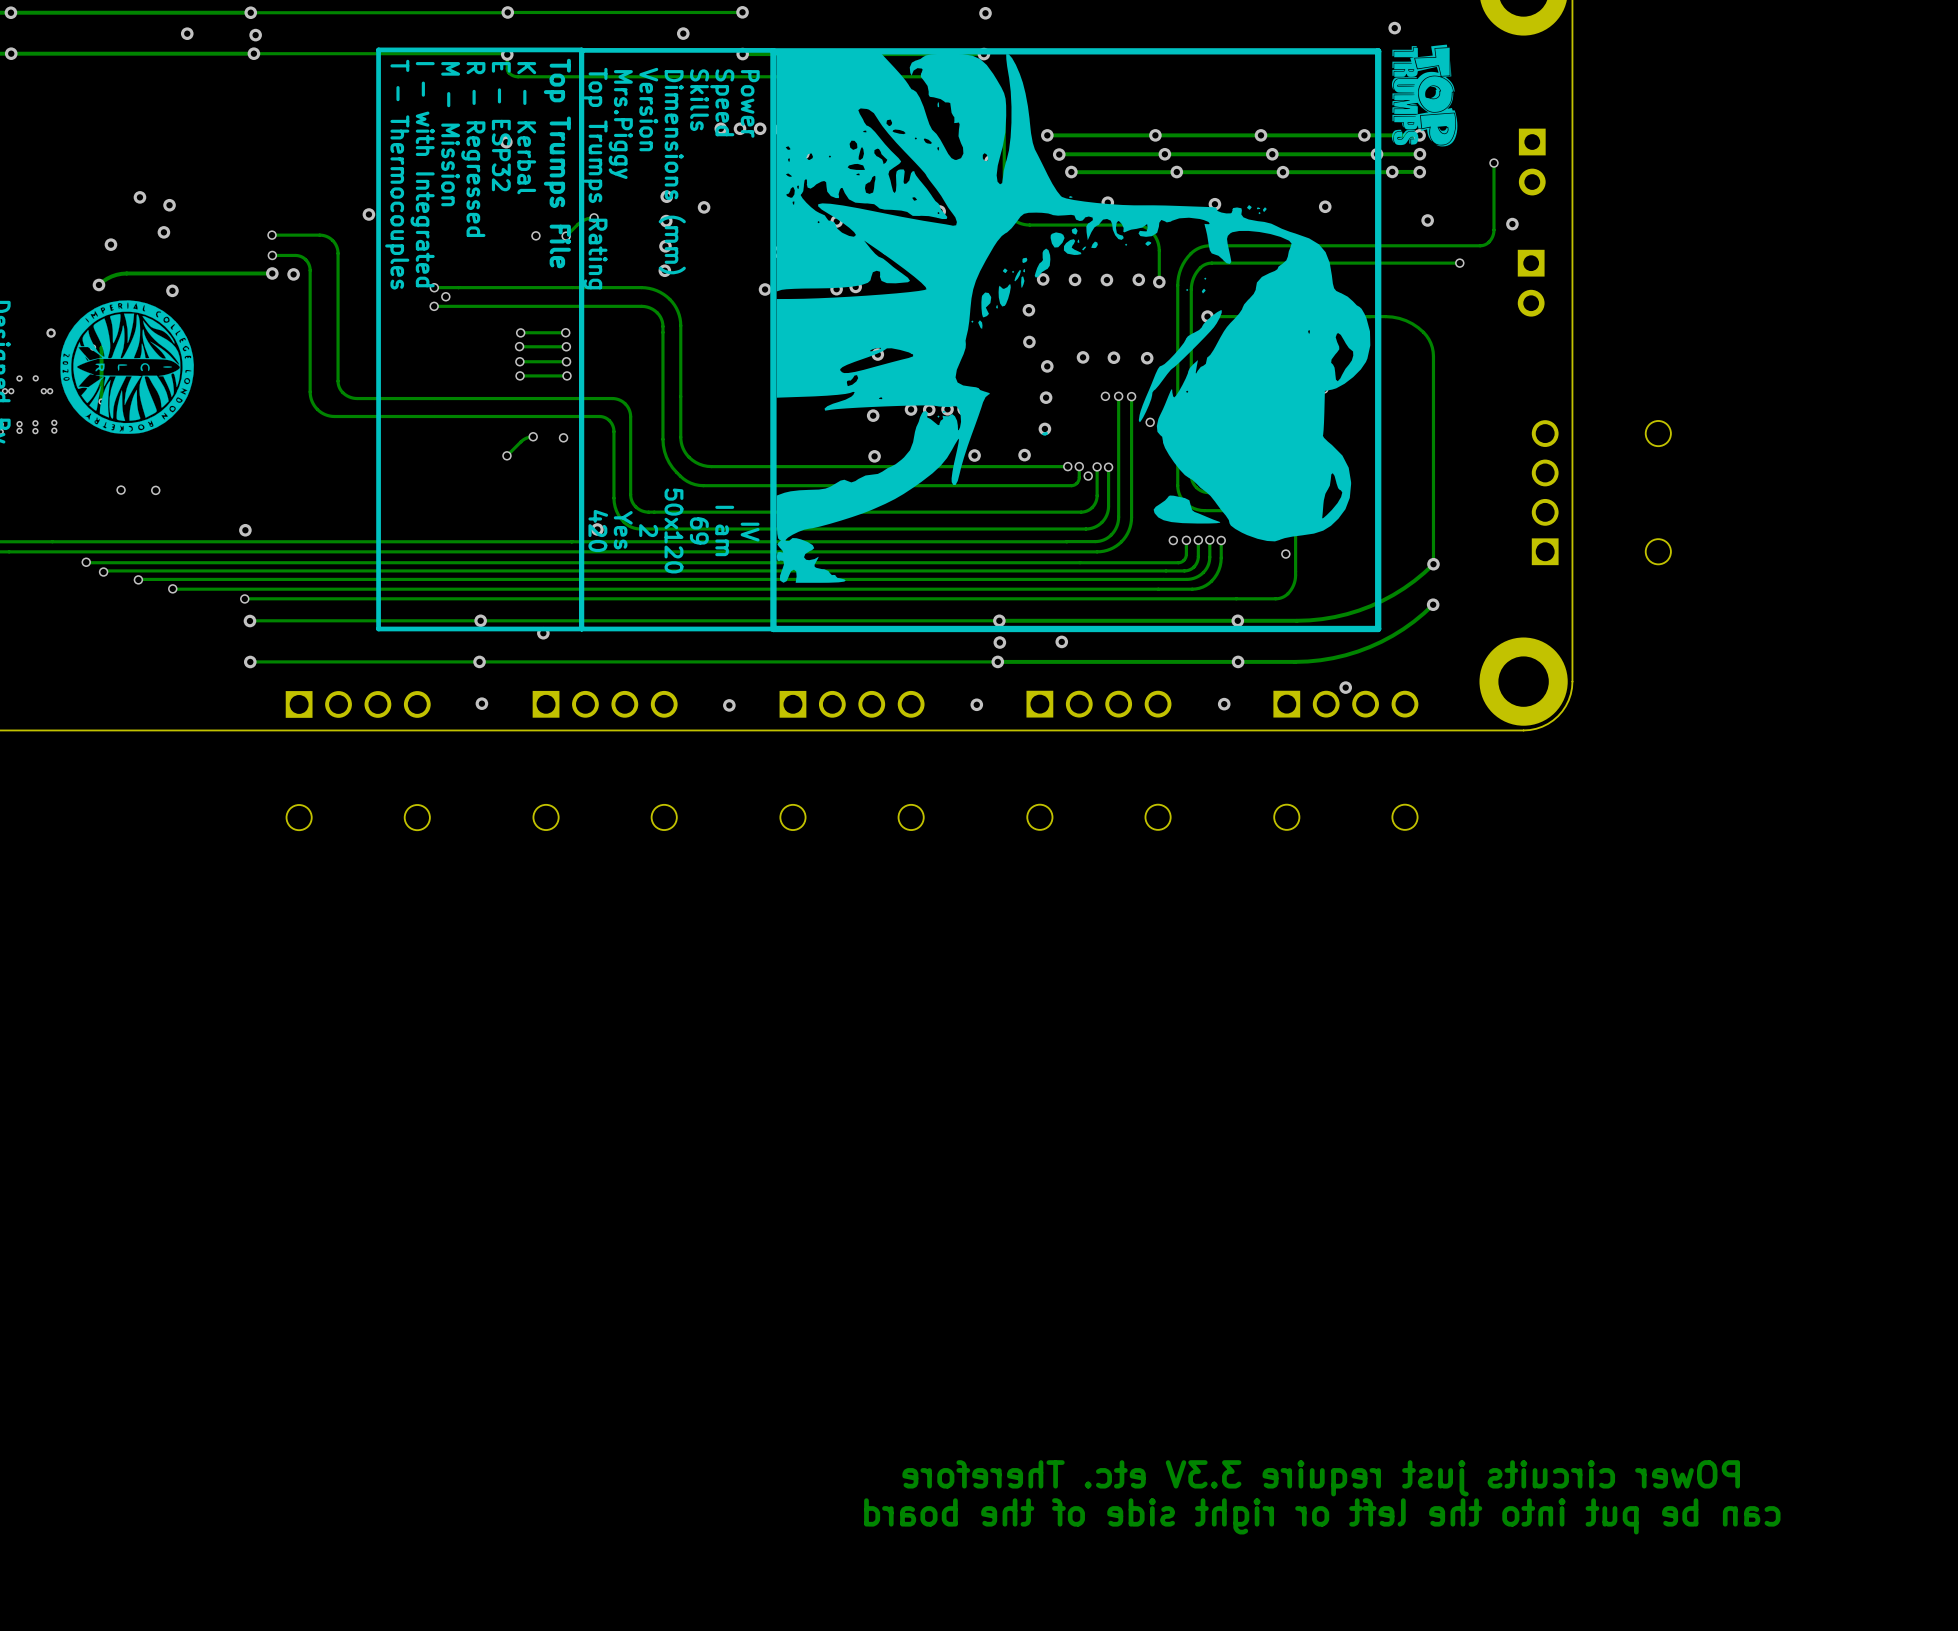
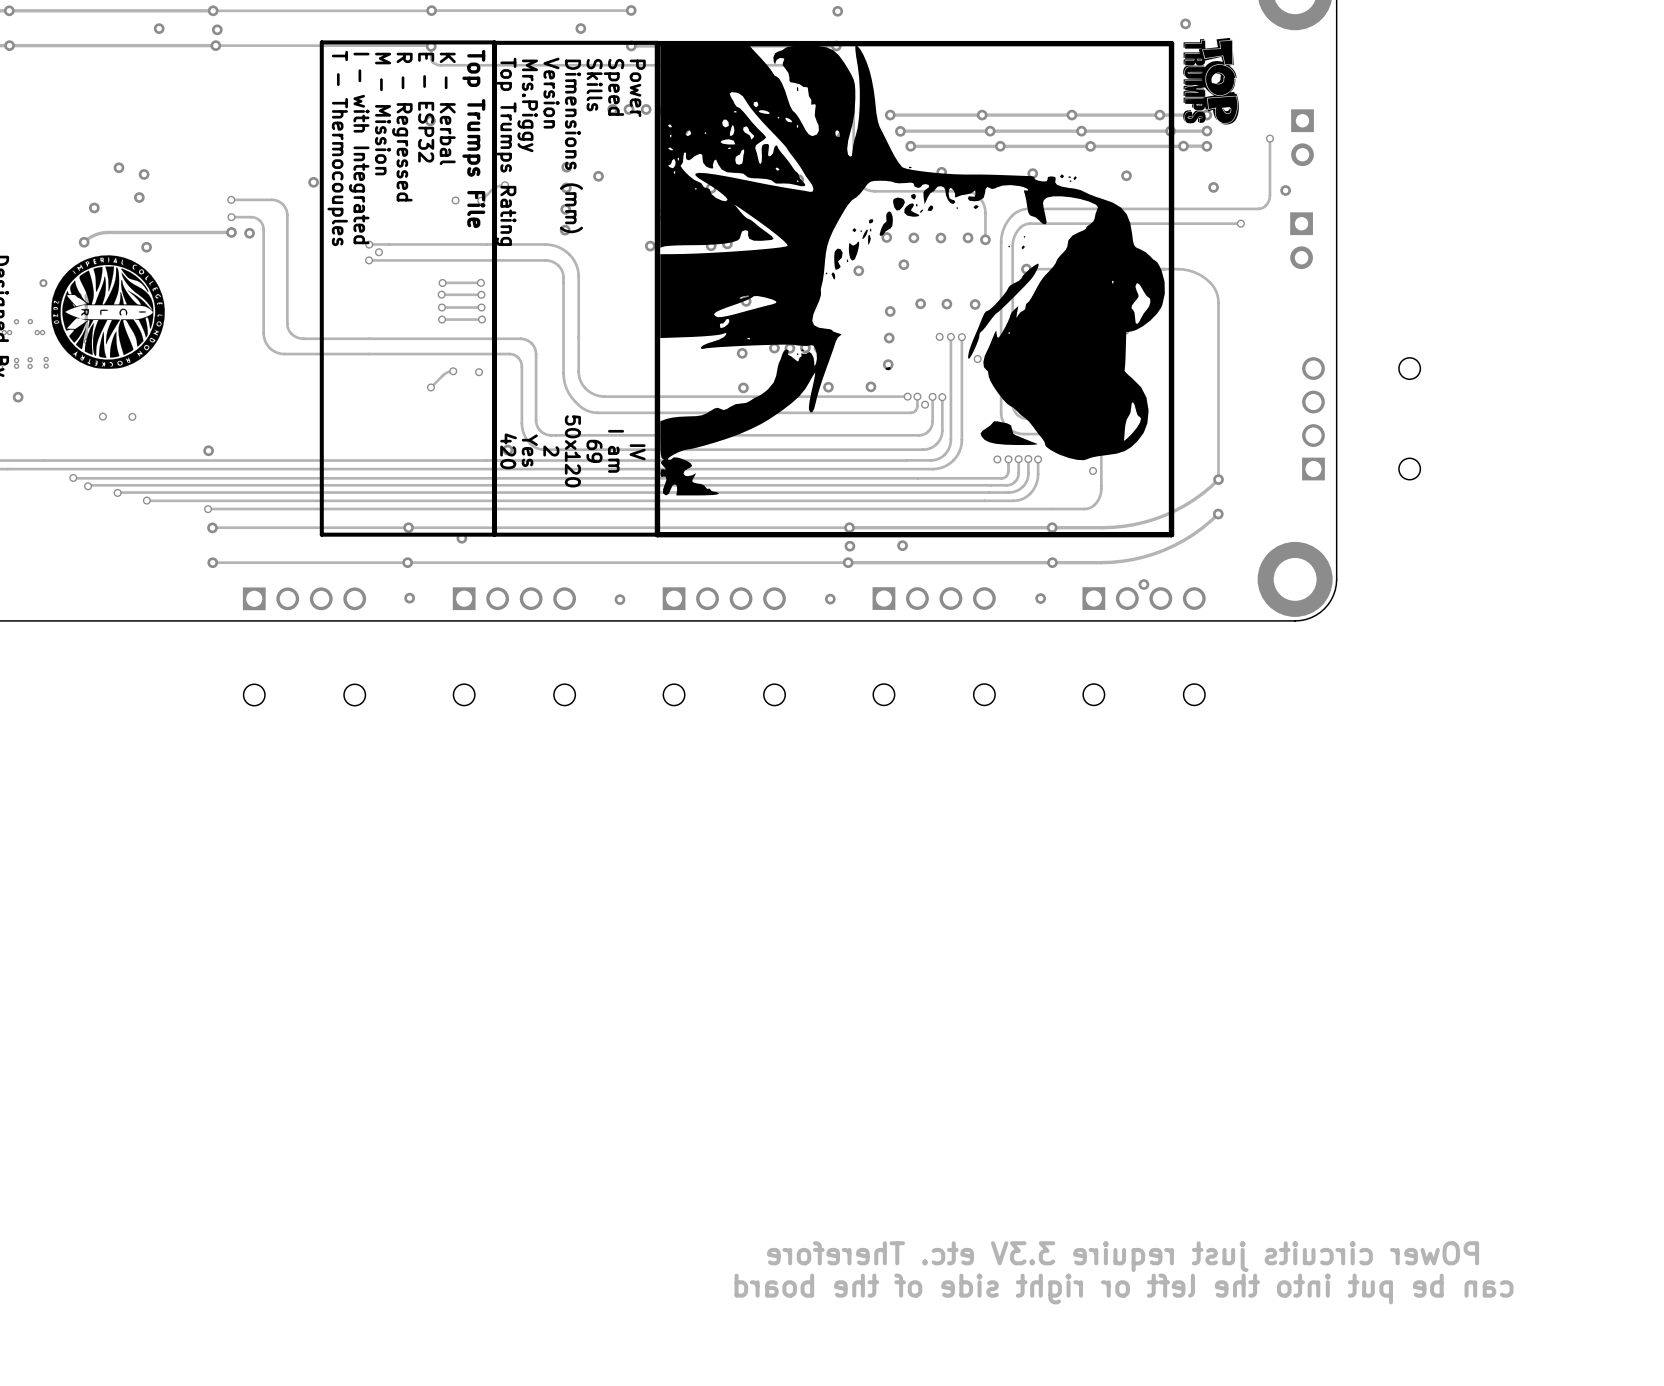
via: (1028, 310) -> none
via: none -> (903, 264)
via: none -> (858, 270)
via: (1029, 342) -> none
via: none -> (18, 397)

